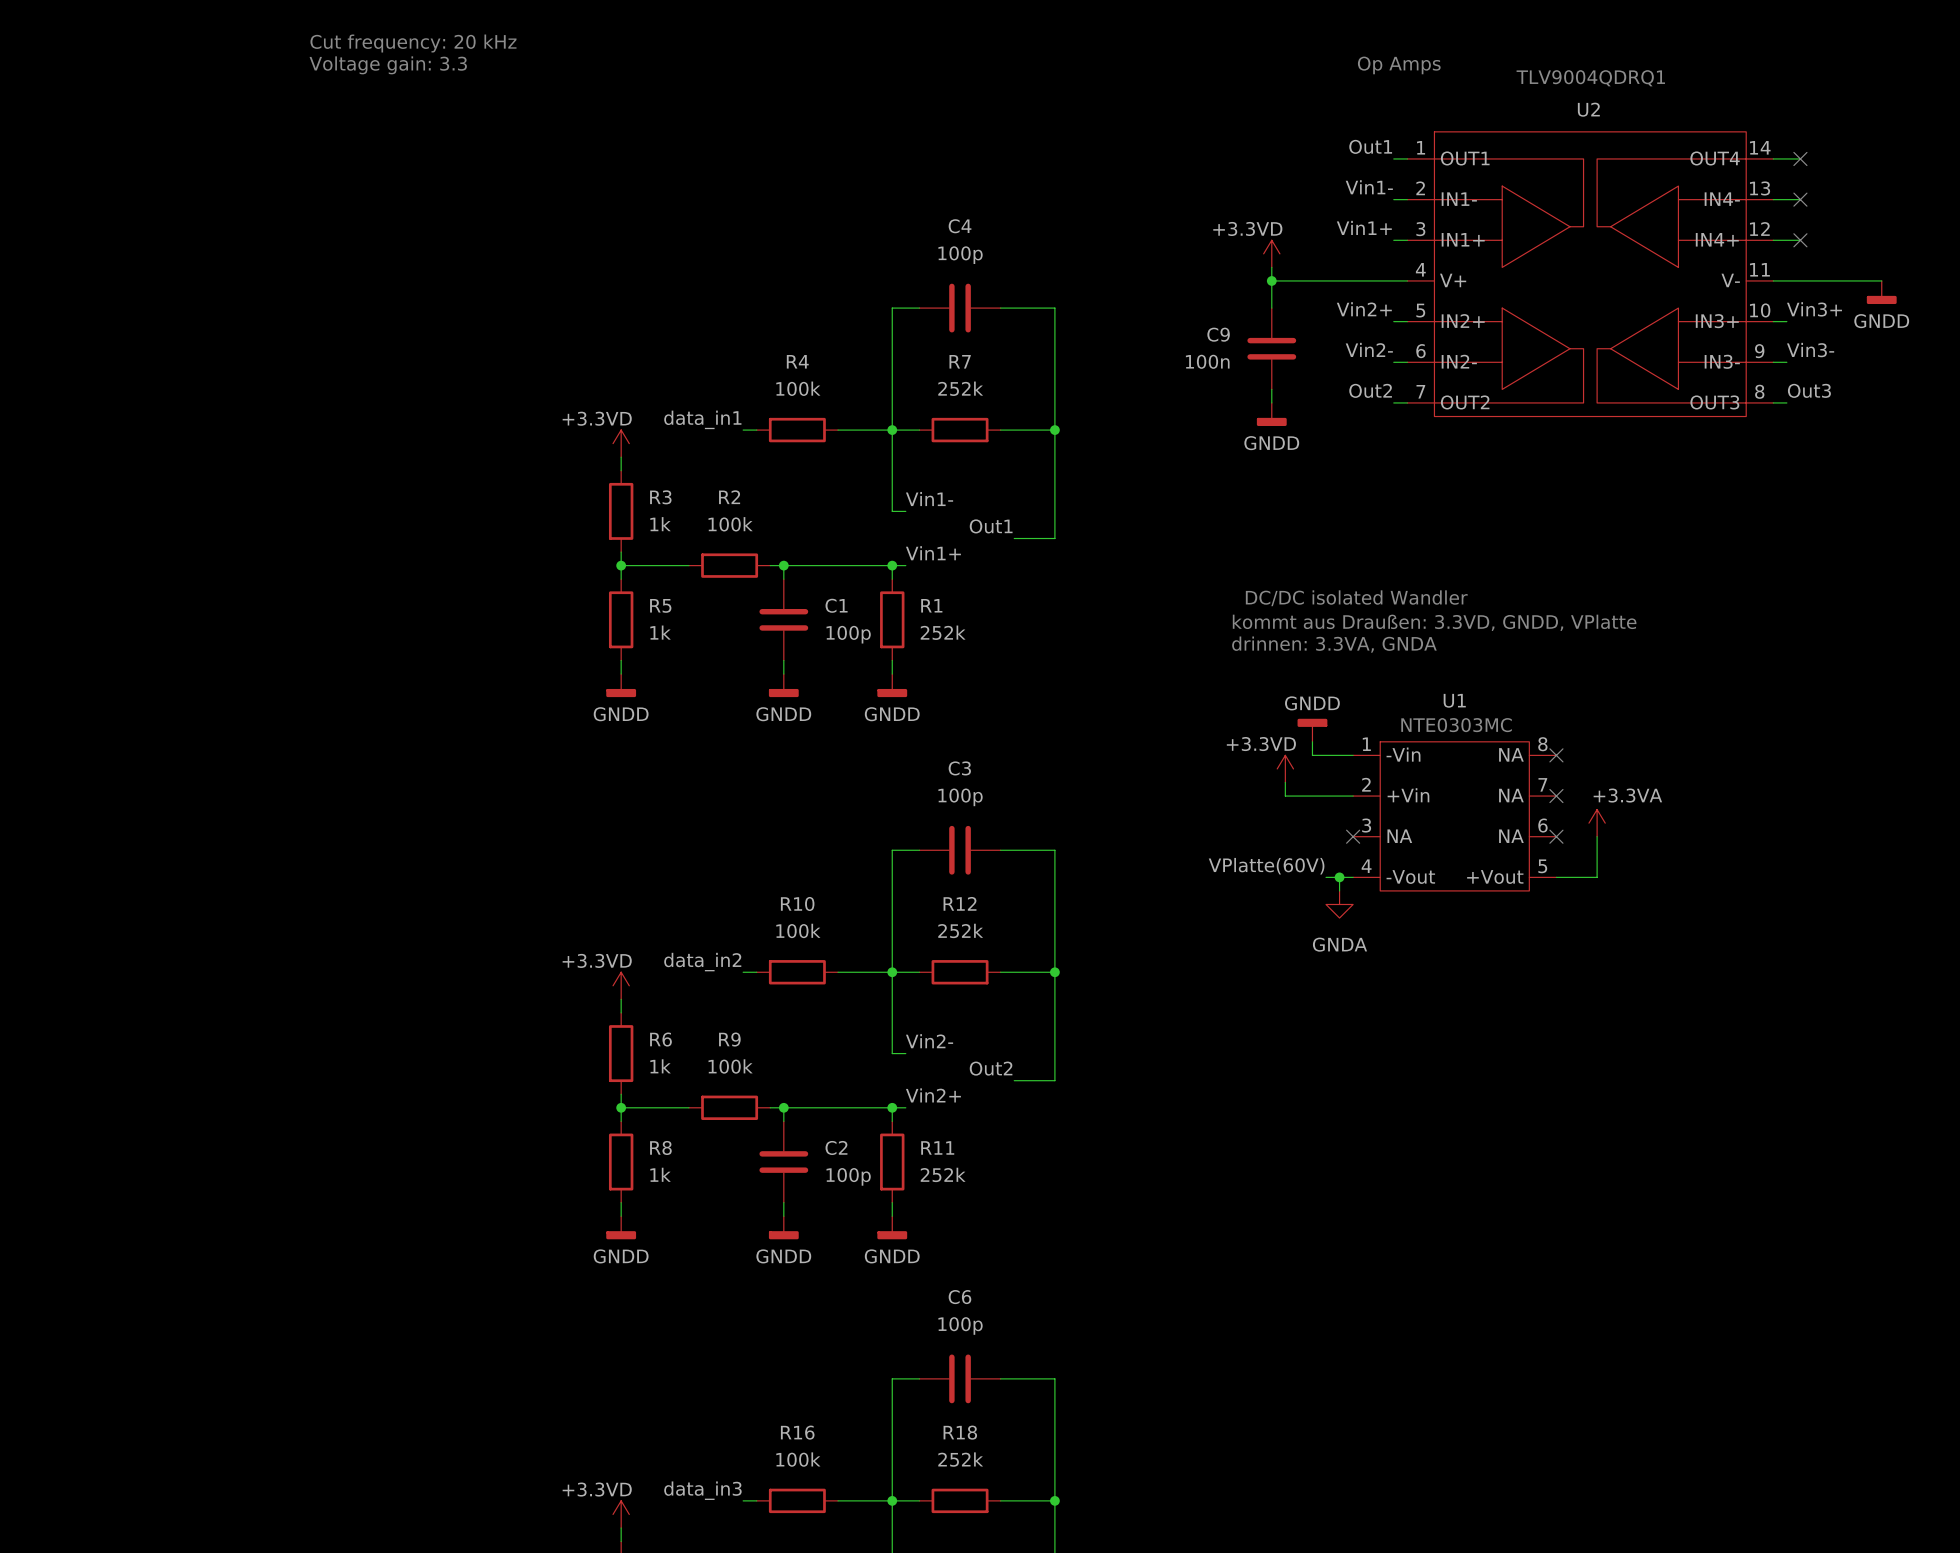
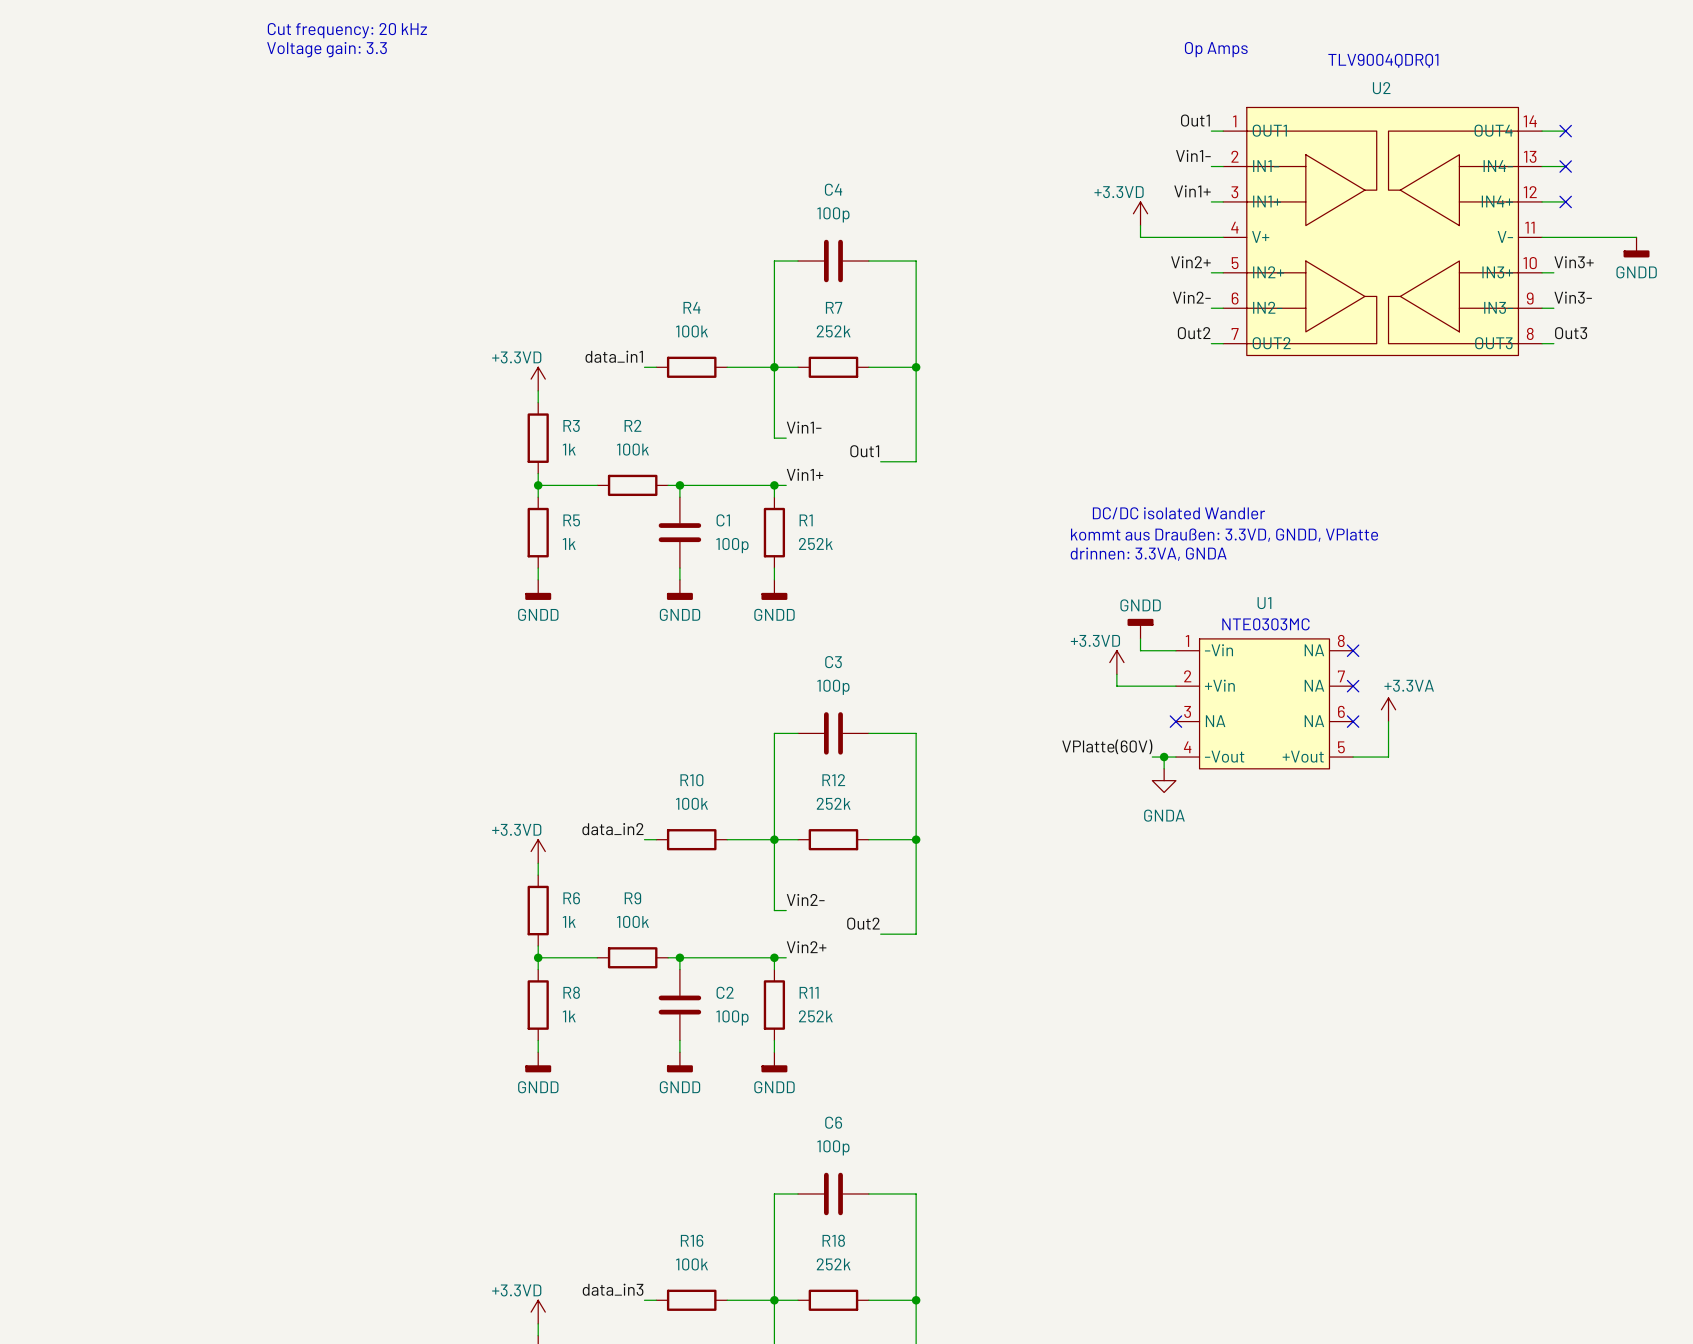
power symbol position: +3.3VD (1271, 253) -> +3.3VD (1140, 213)
wire: (1271, 267) (1271, 308) -> none
wire: (1271, 280) (1312, 280) -> (1140, 225) (1140, 237)
junction: (1271, 280) -> none
C9: 100n (1271, 348) -> none
wire: (1271, 389) (1271, 402) -> none
power symbol: GNDD (1271, 414) -> none

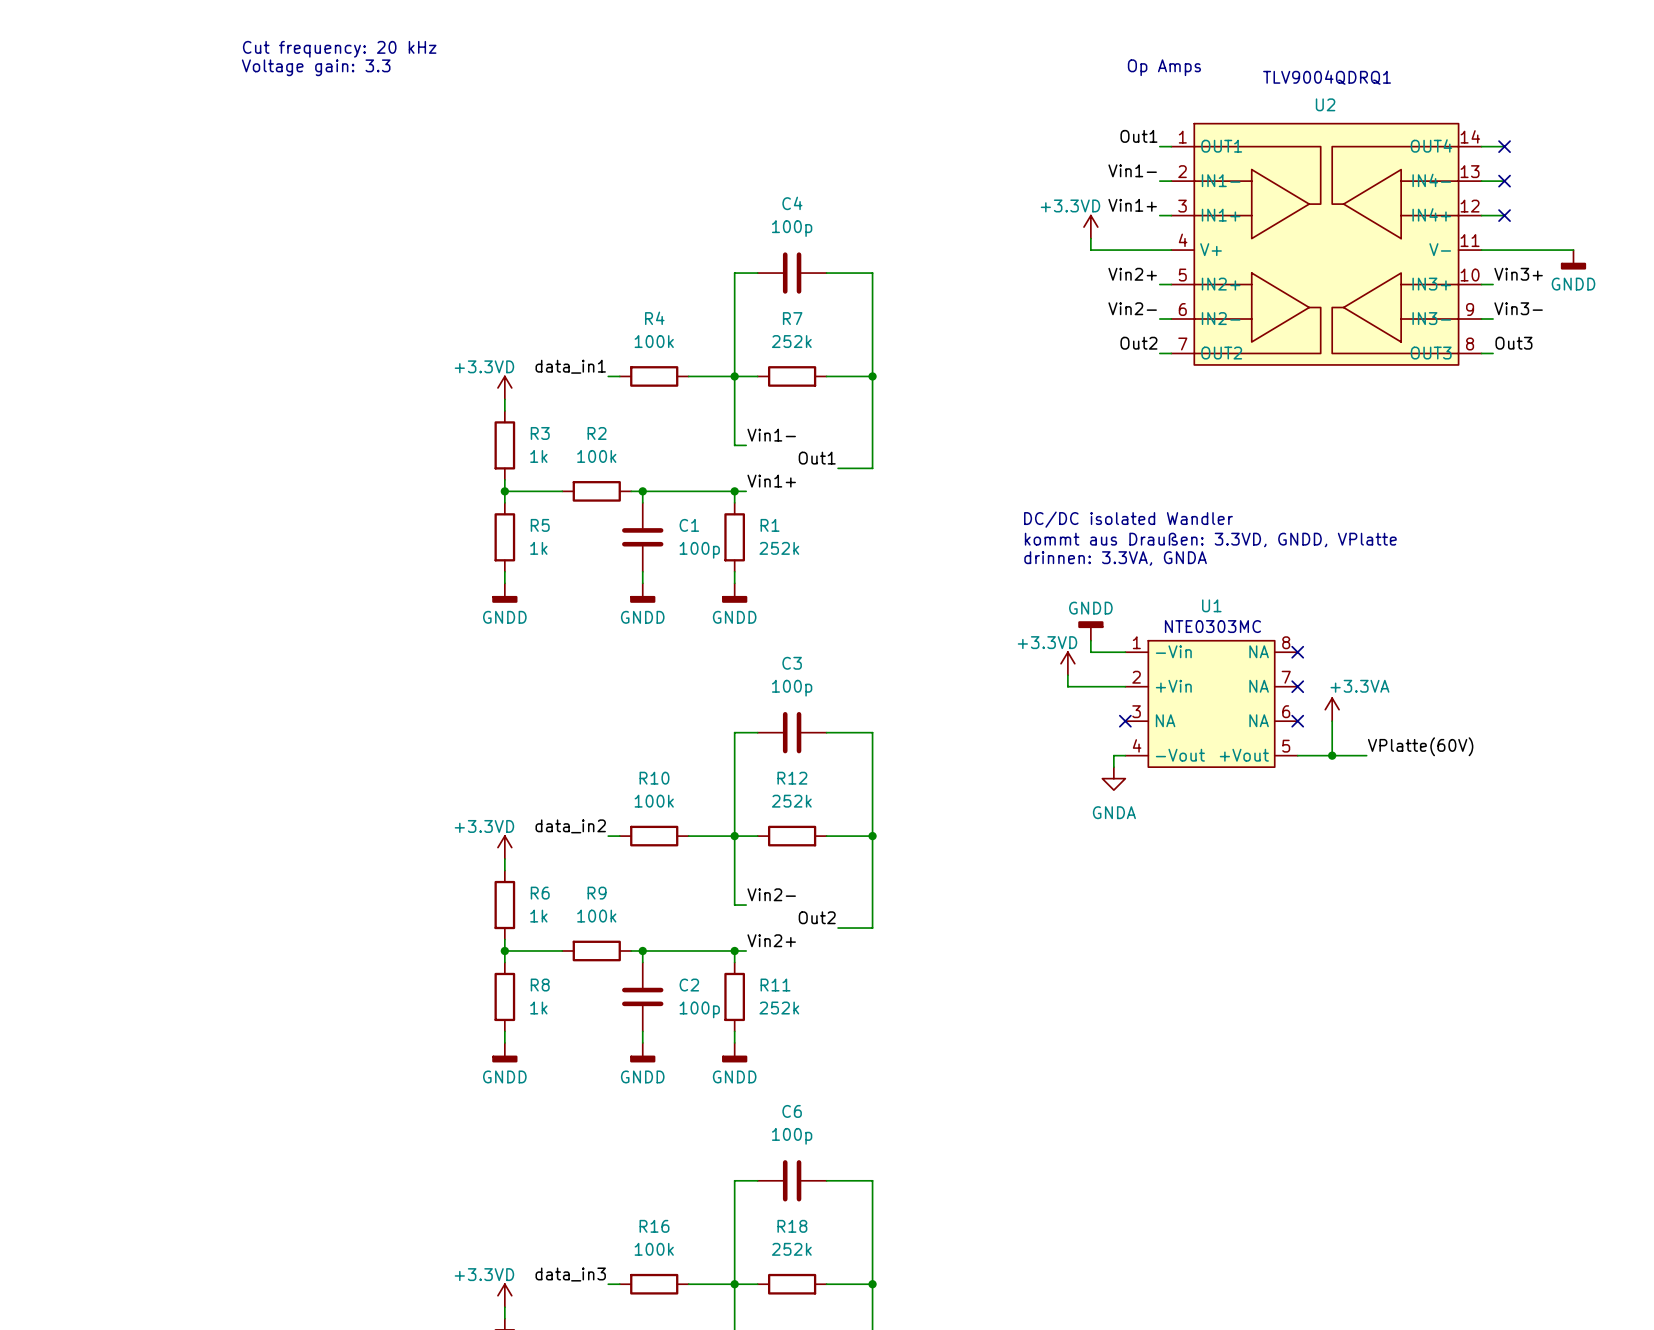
label: VPlatte(60V) (1107, 746) -> none
label: none -> VPlatte(60V) (1420, 746)
wire: (1152, 757) (1164, 757) -> none
junction: (1164, 757) -> none
wire: none -> (1332, 755) (1366, 755)
junction: none -> (1332, 755)

